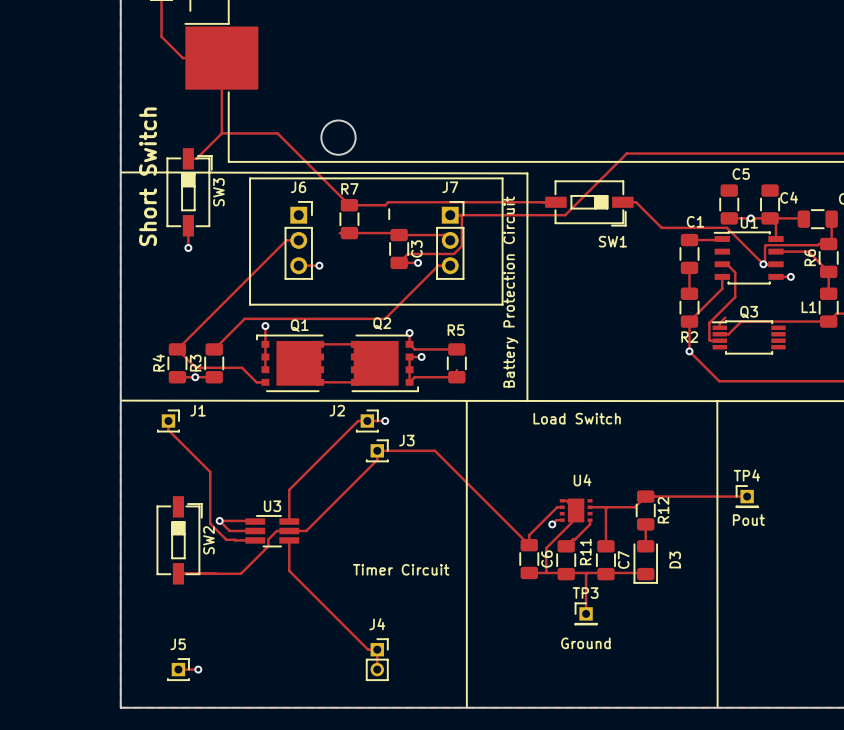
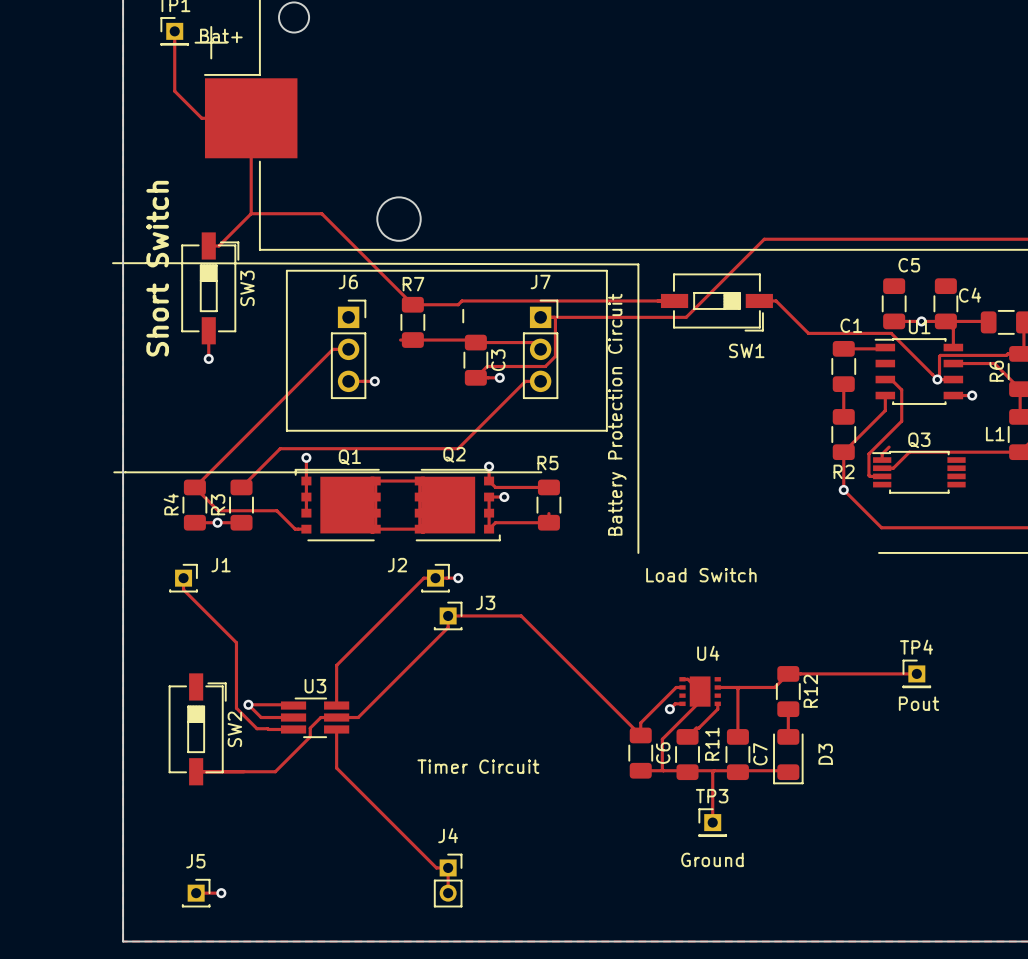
line: none -> (113, 263) (123, 263)
line: none -> (114, 472) (541, 472)
line: (120, 400) (717, 401) (717, 706) -> none
line: (466, 401) (466, 707) -> none

